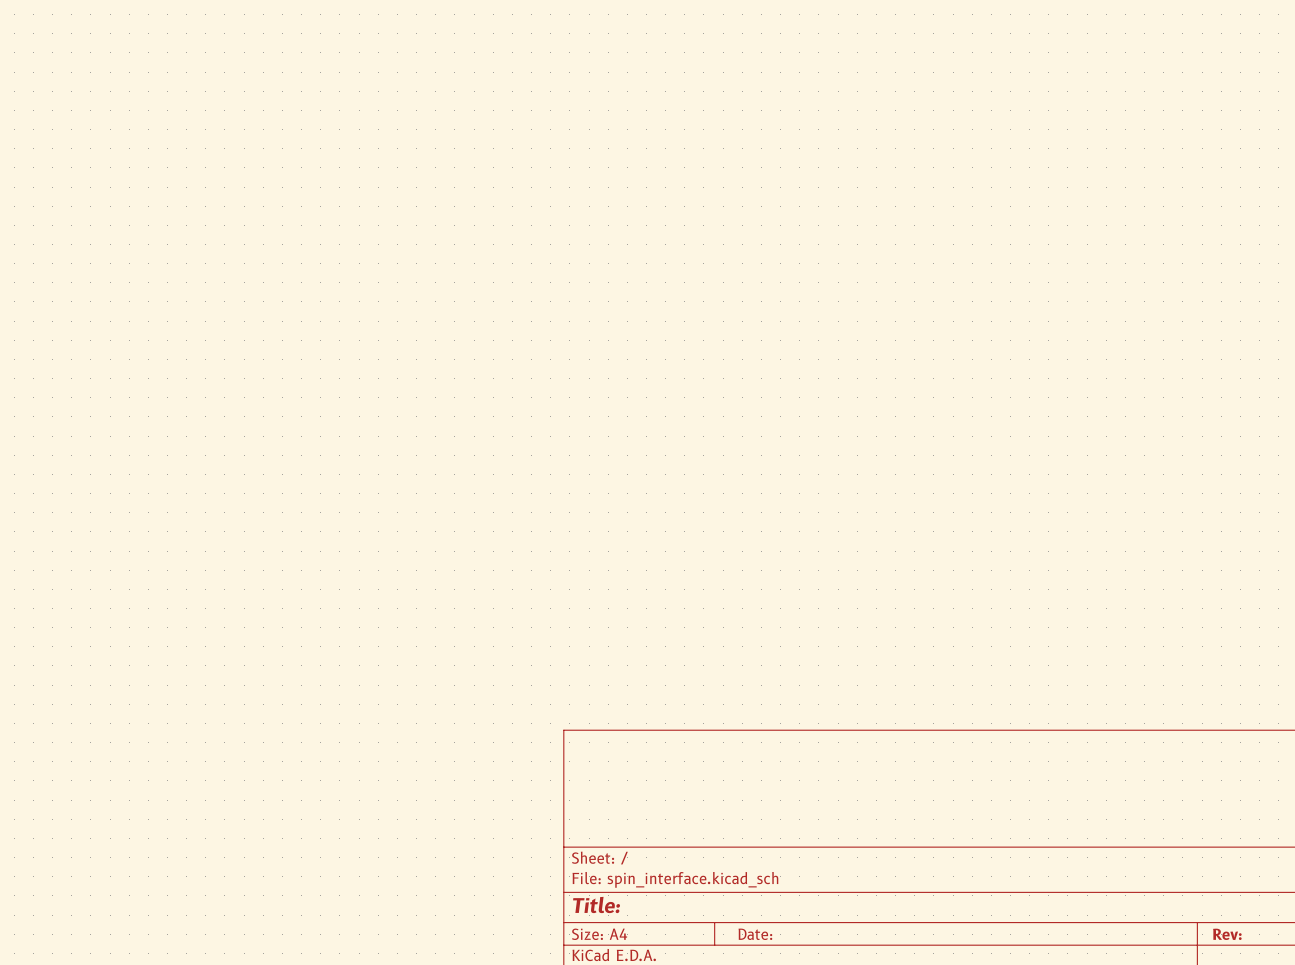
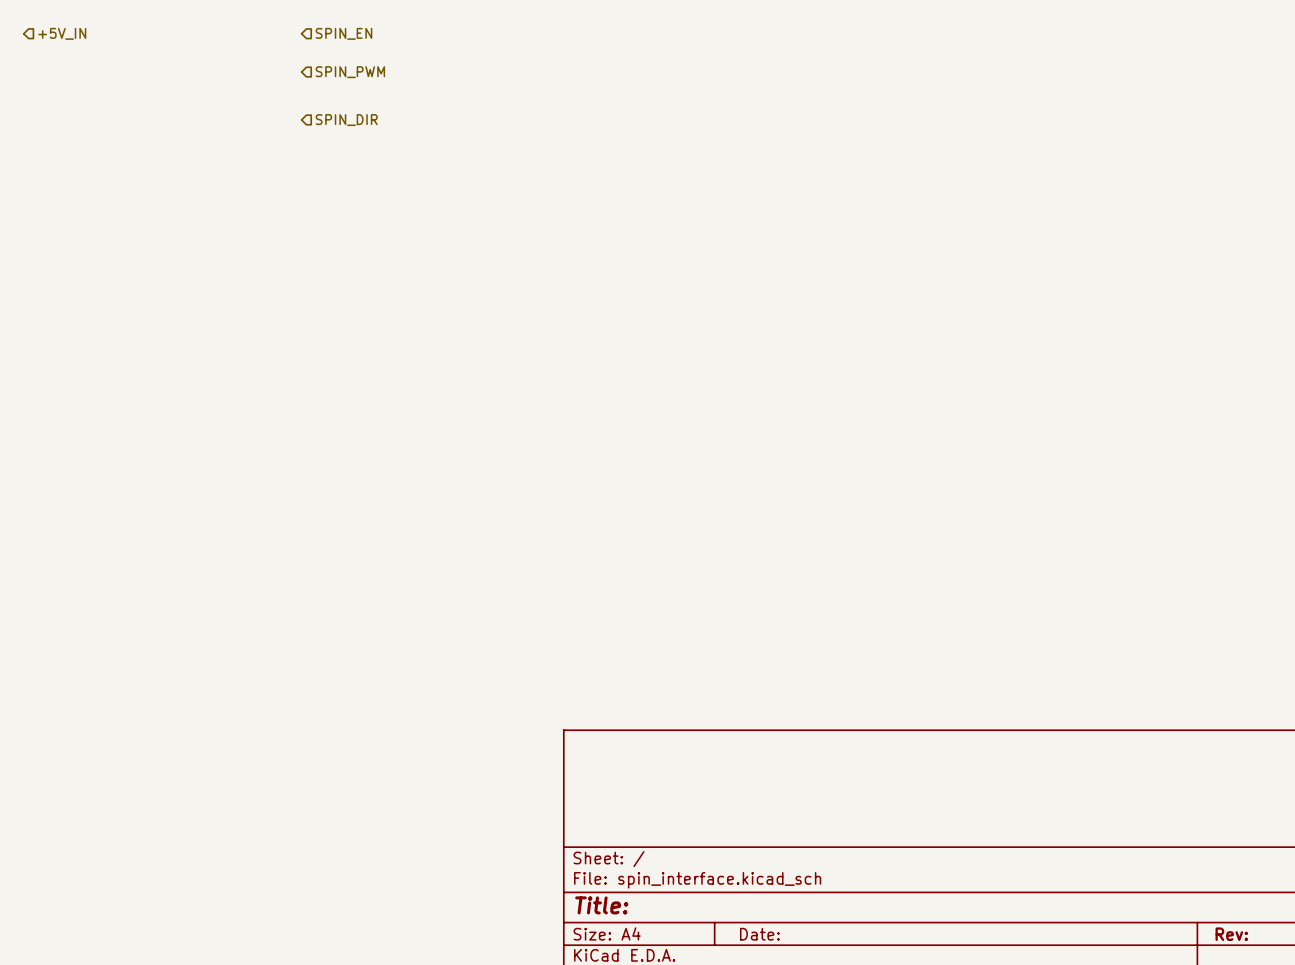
hierarchical label: none -> +5V_IN (62, 33)
hierarchical label: none -> SPIN_EN (343, 33)
hierarchical label: none -> SPIN_PWM (350, 72)
hierarchical label: none -> SPIN_DIR (346, 120)

